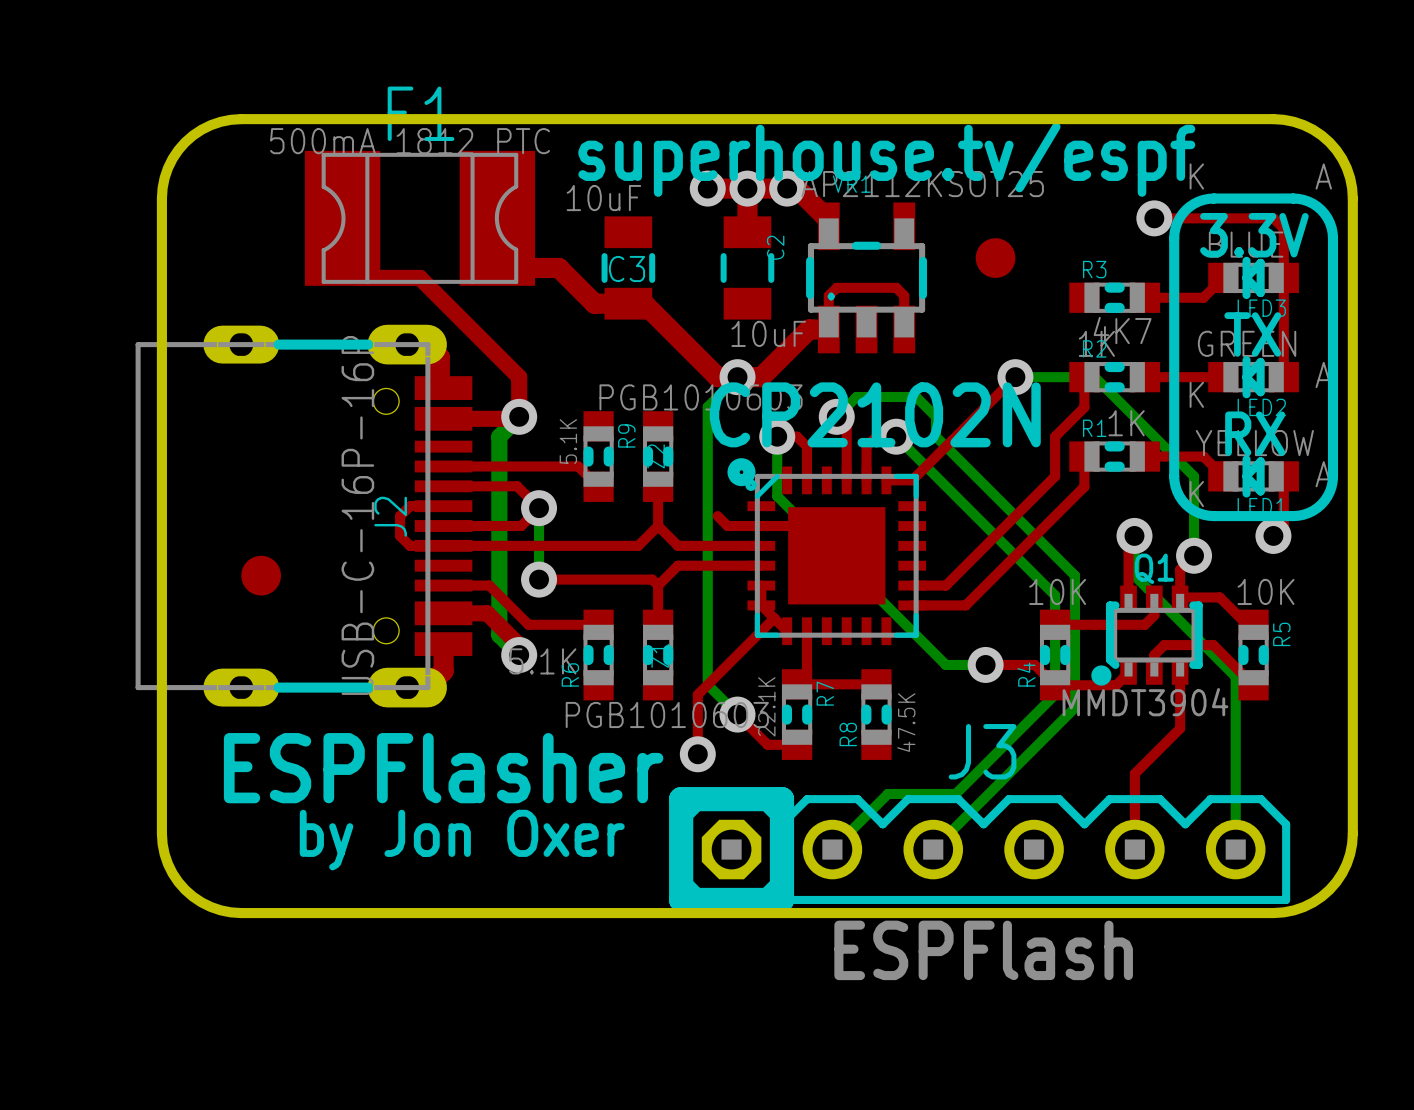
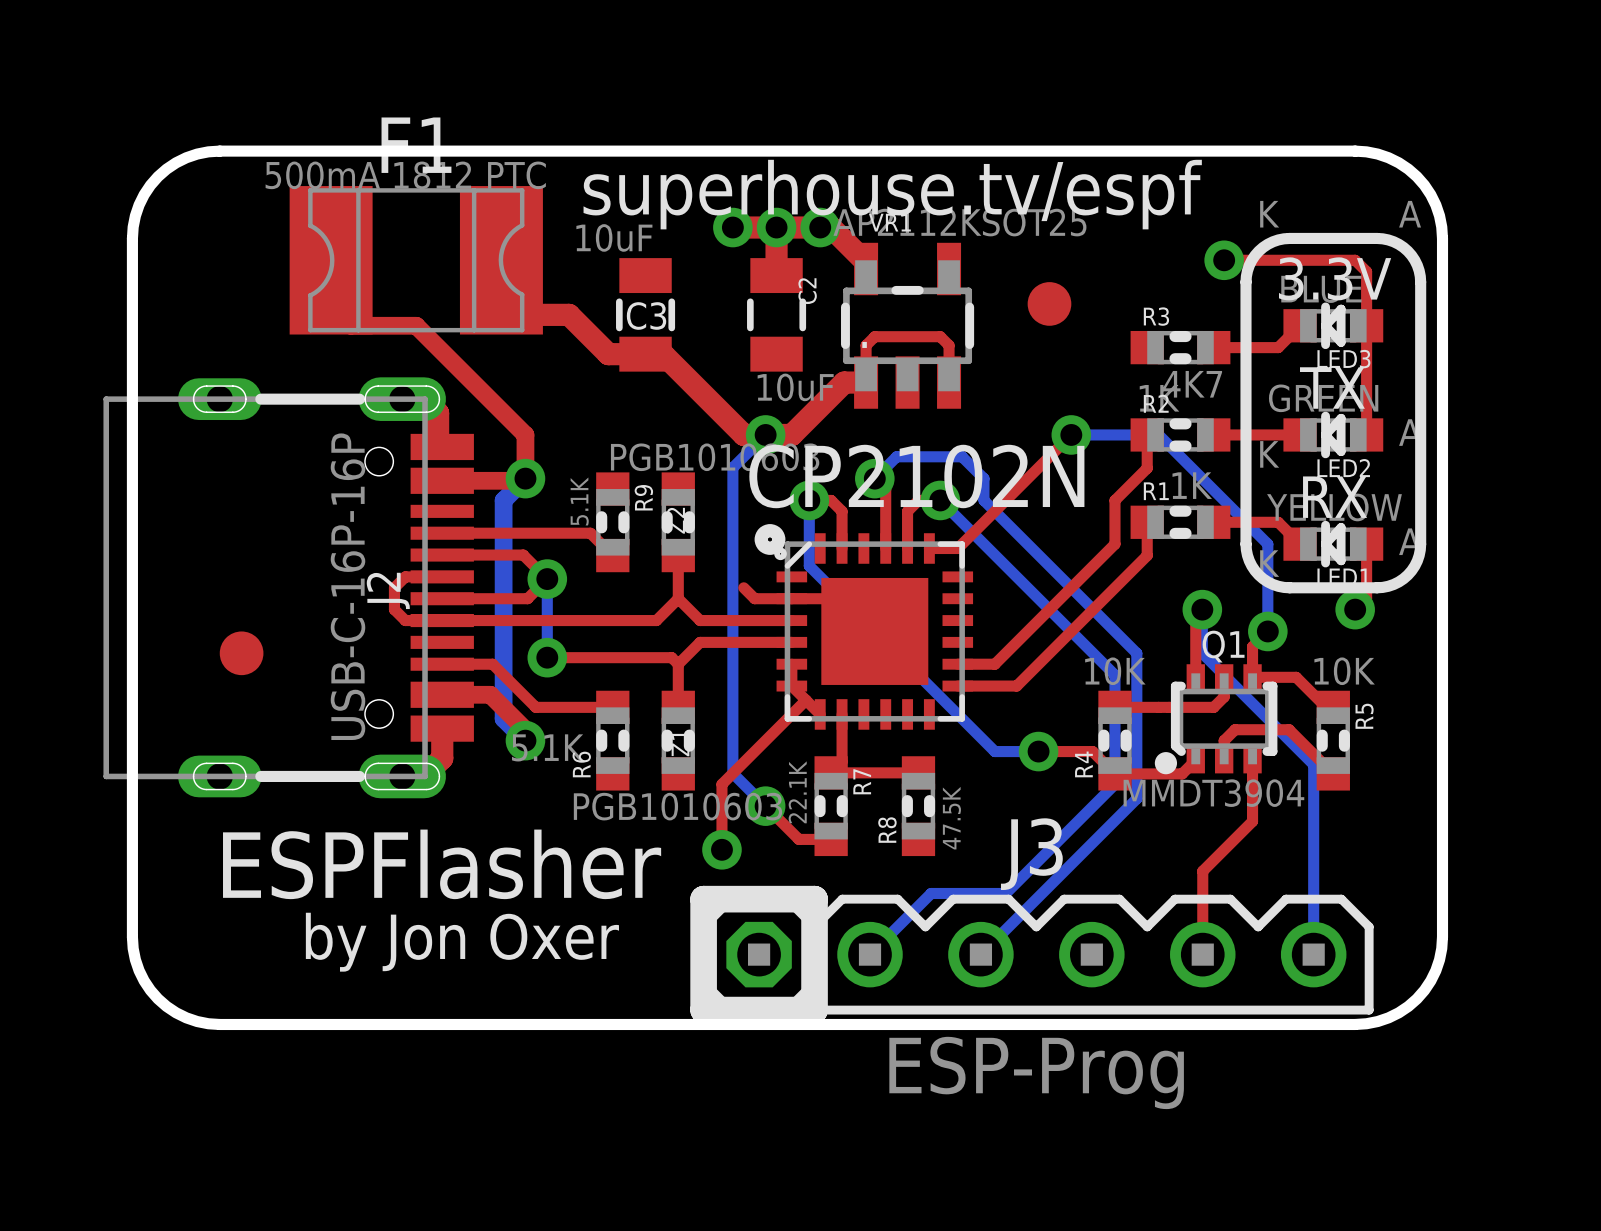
J3 text: ESPFlash (983, 950) -> ESP-Prog (1036, 1072)

